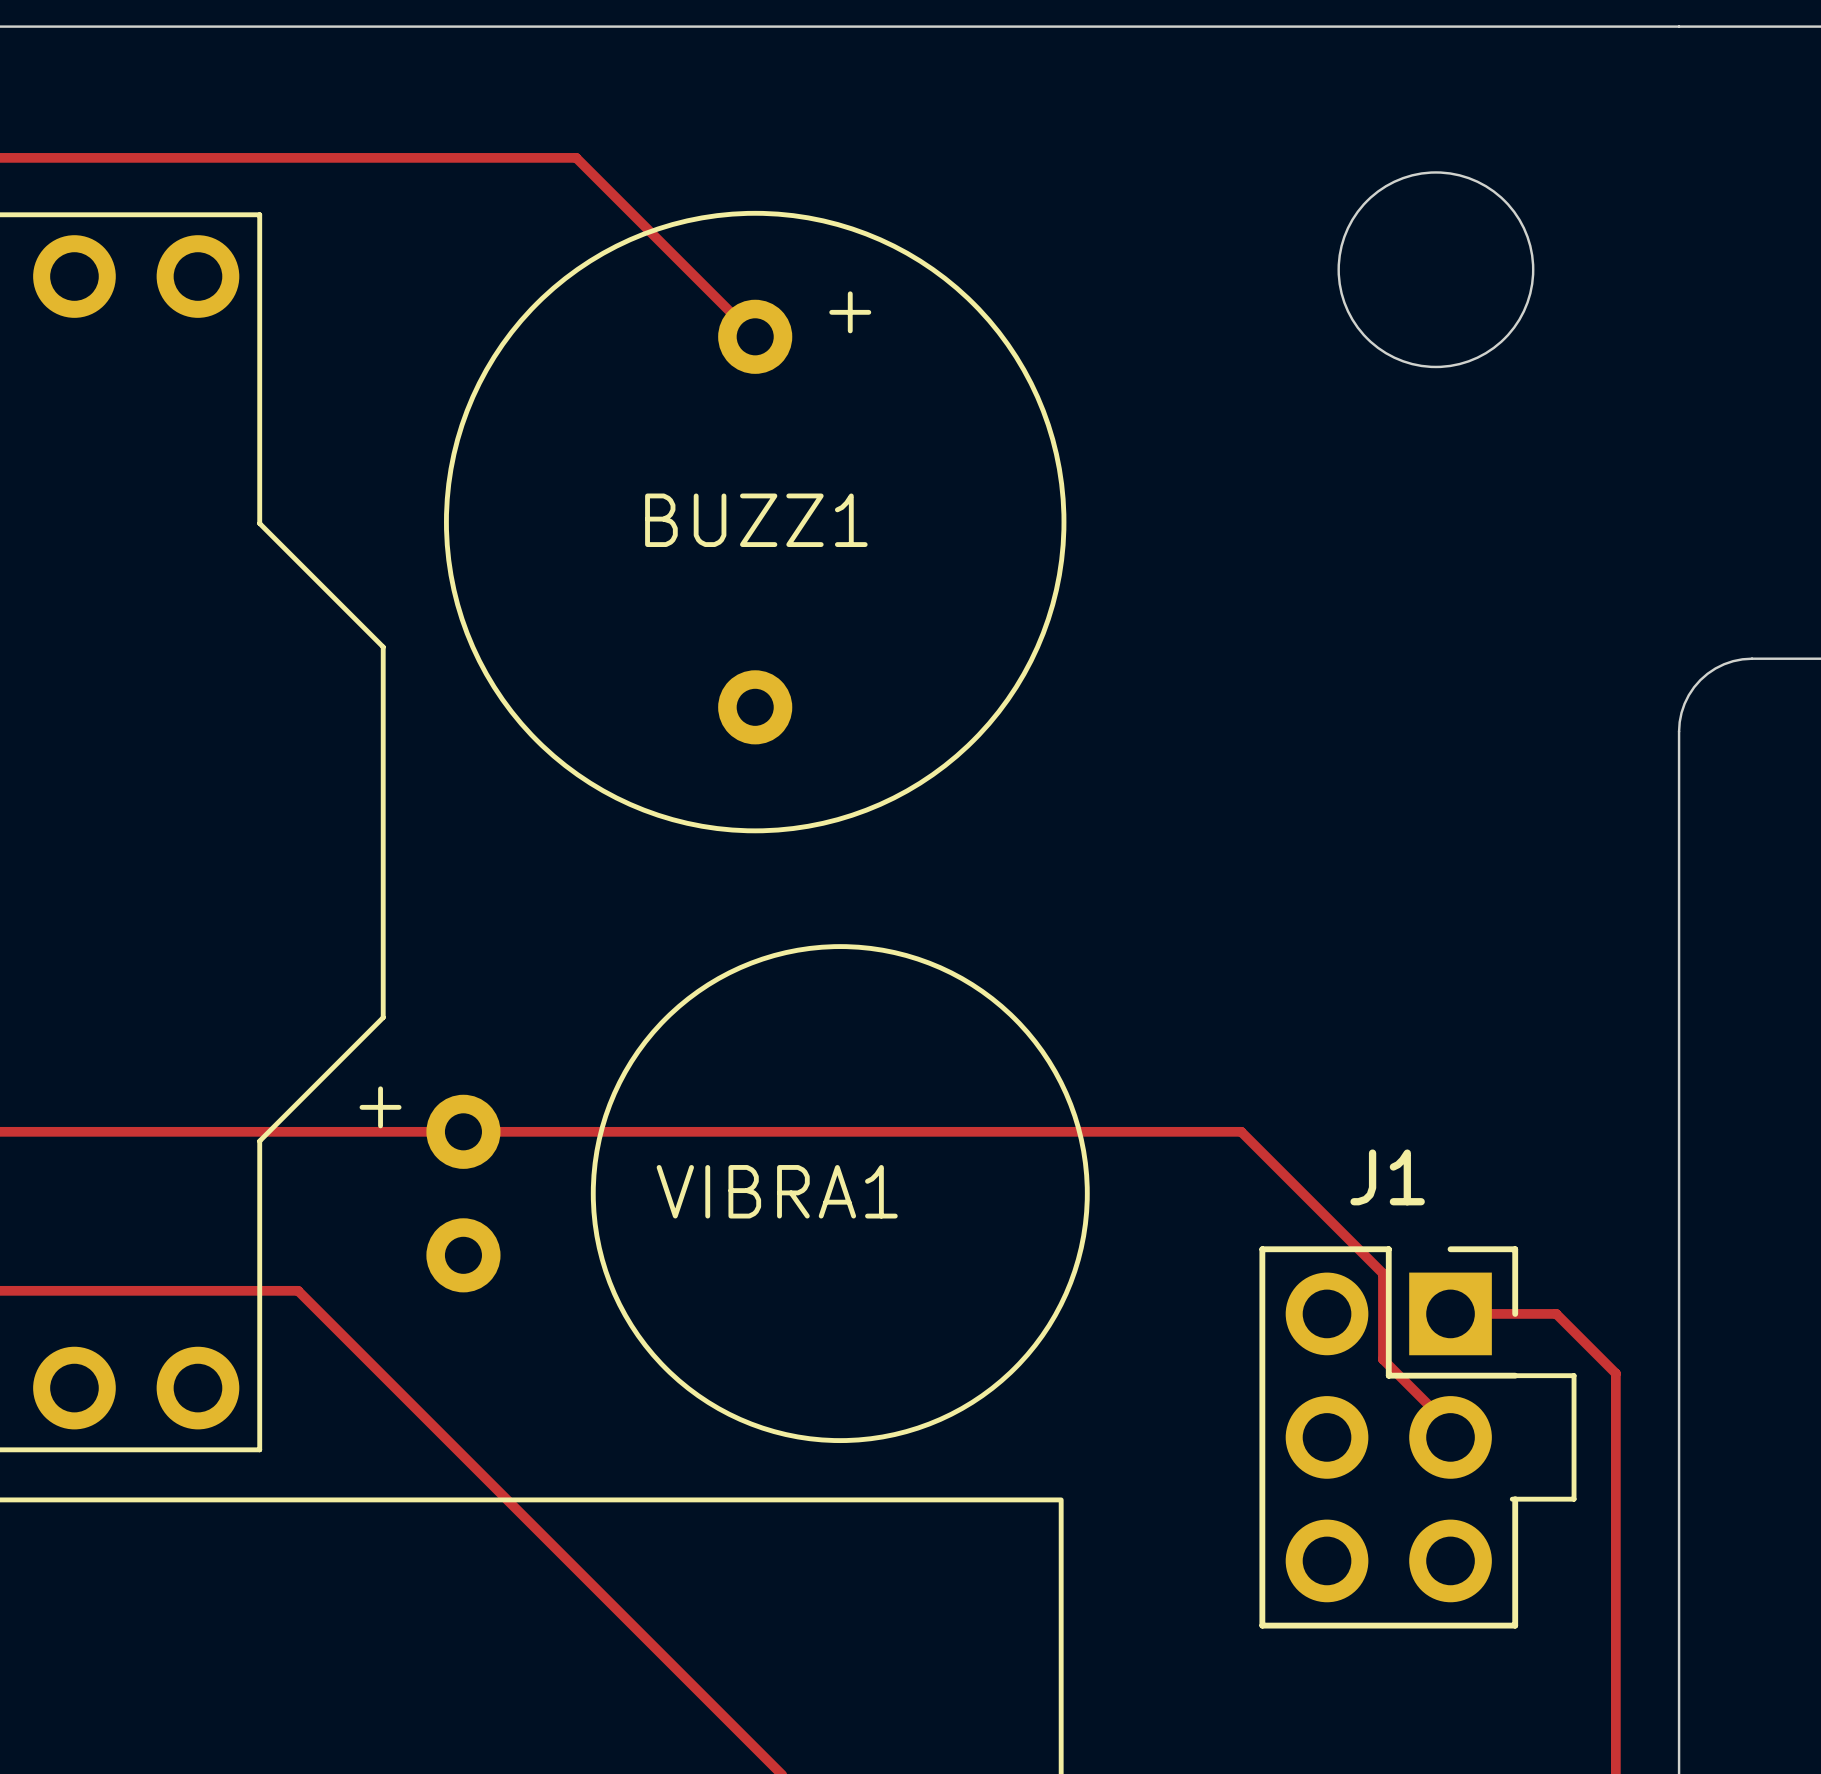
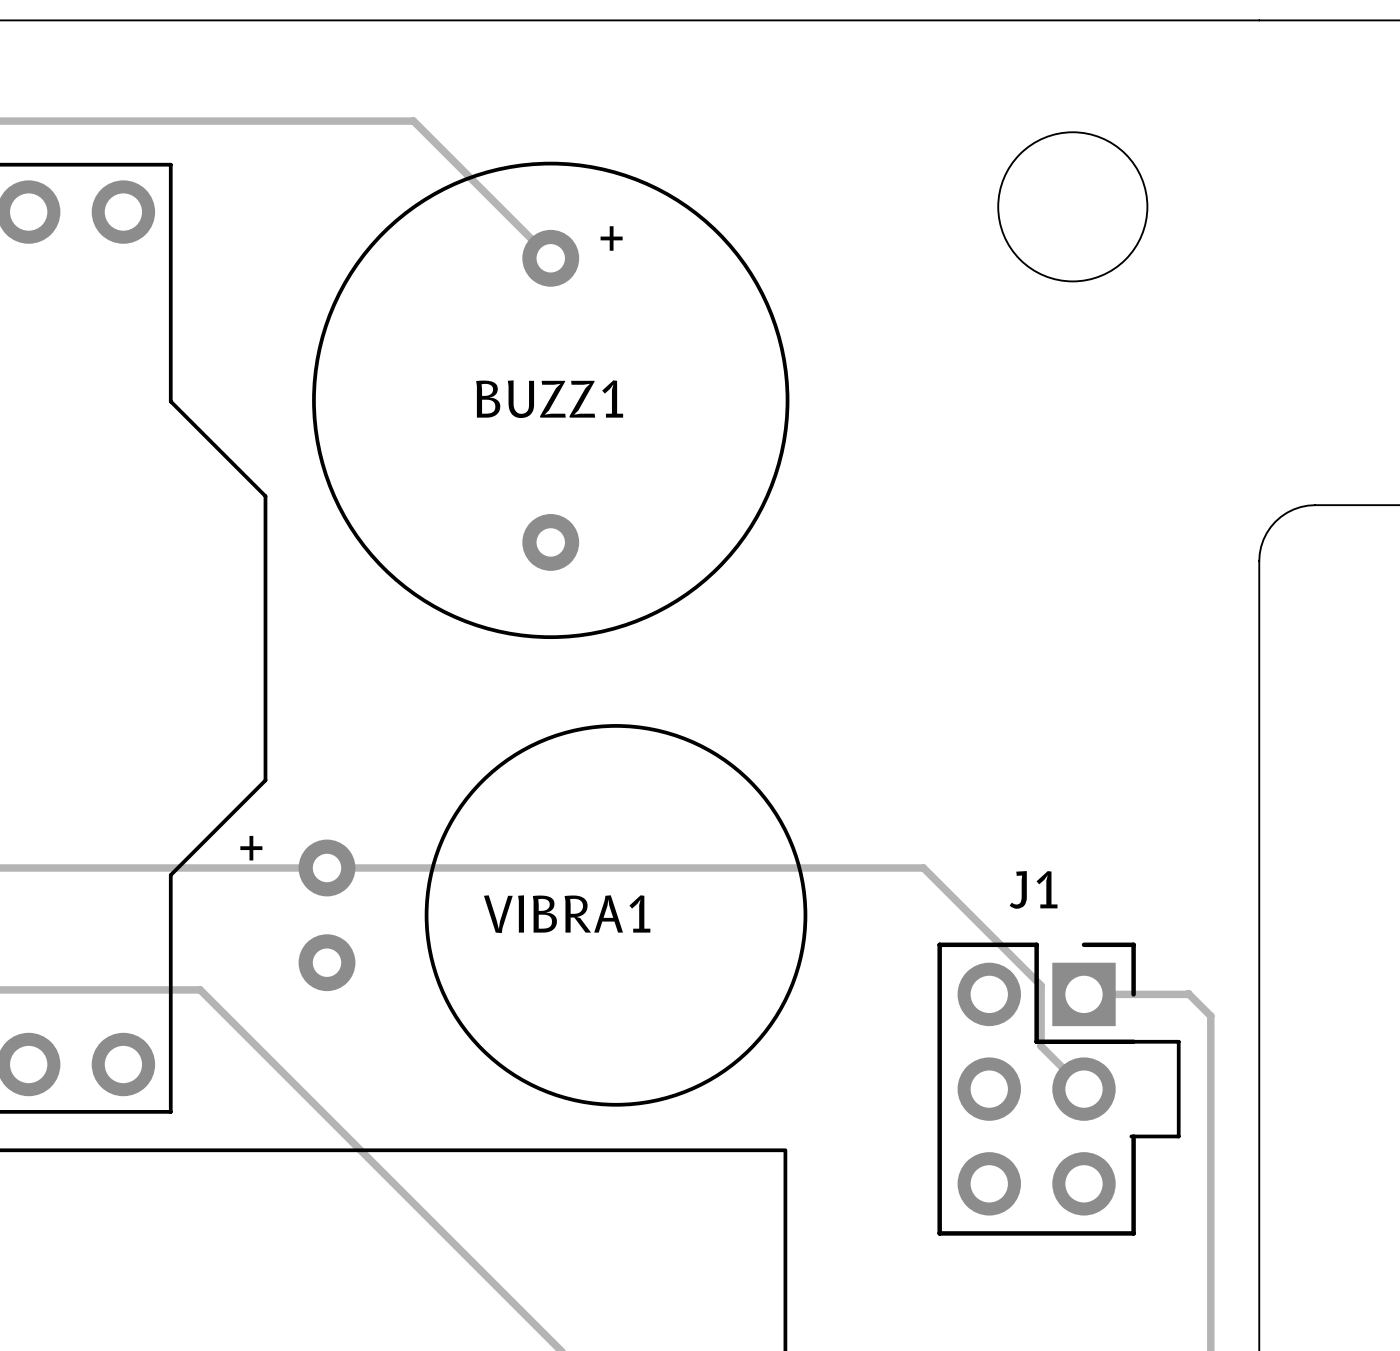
track: (1382, 1273) (1382, 1359) (1450, 1426) (1450, 1437) -> (1032, 976) (1041, 985) (1041, 1046) (1084, 1089)
track: (1450, 1313) (1556, 1313) (1615, 1373) -> (1084, 994) (1188, 993) (1210, 1016) (1210, 1053)
J1 position: (1417, 1437) -> (1059, 1089)

